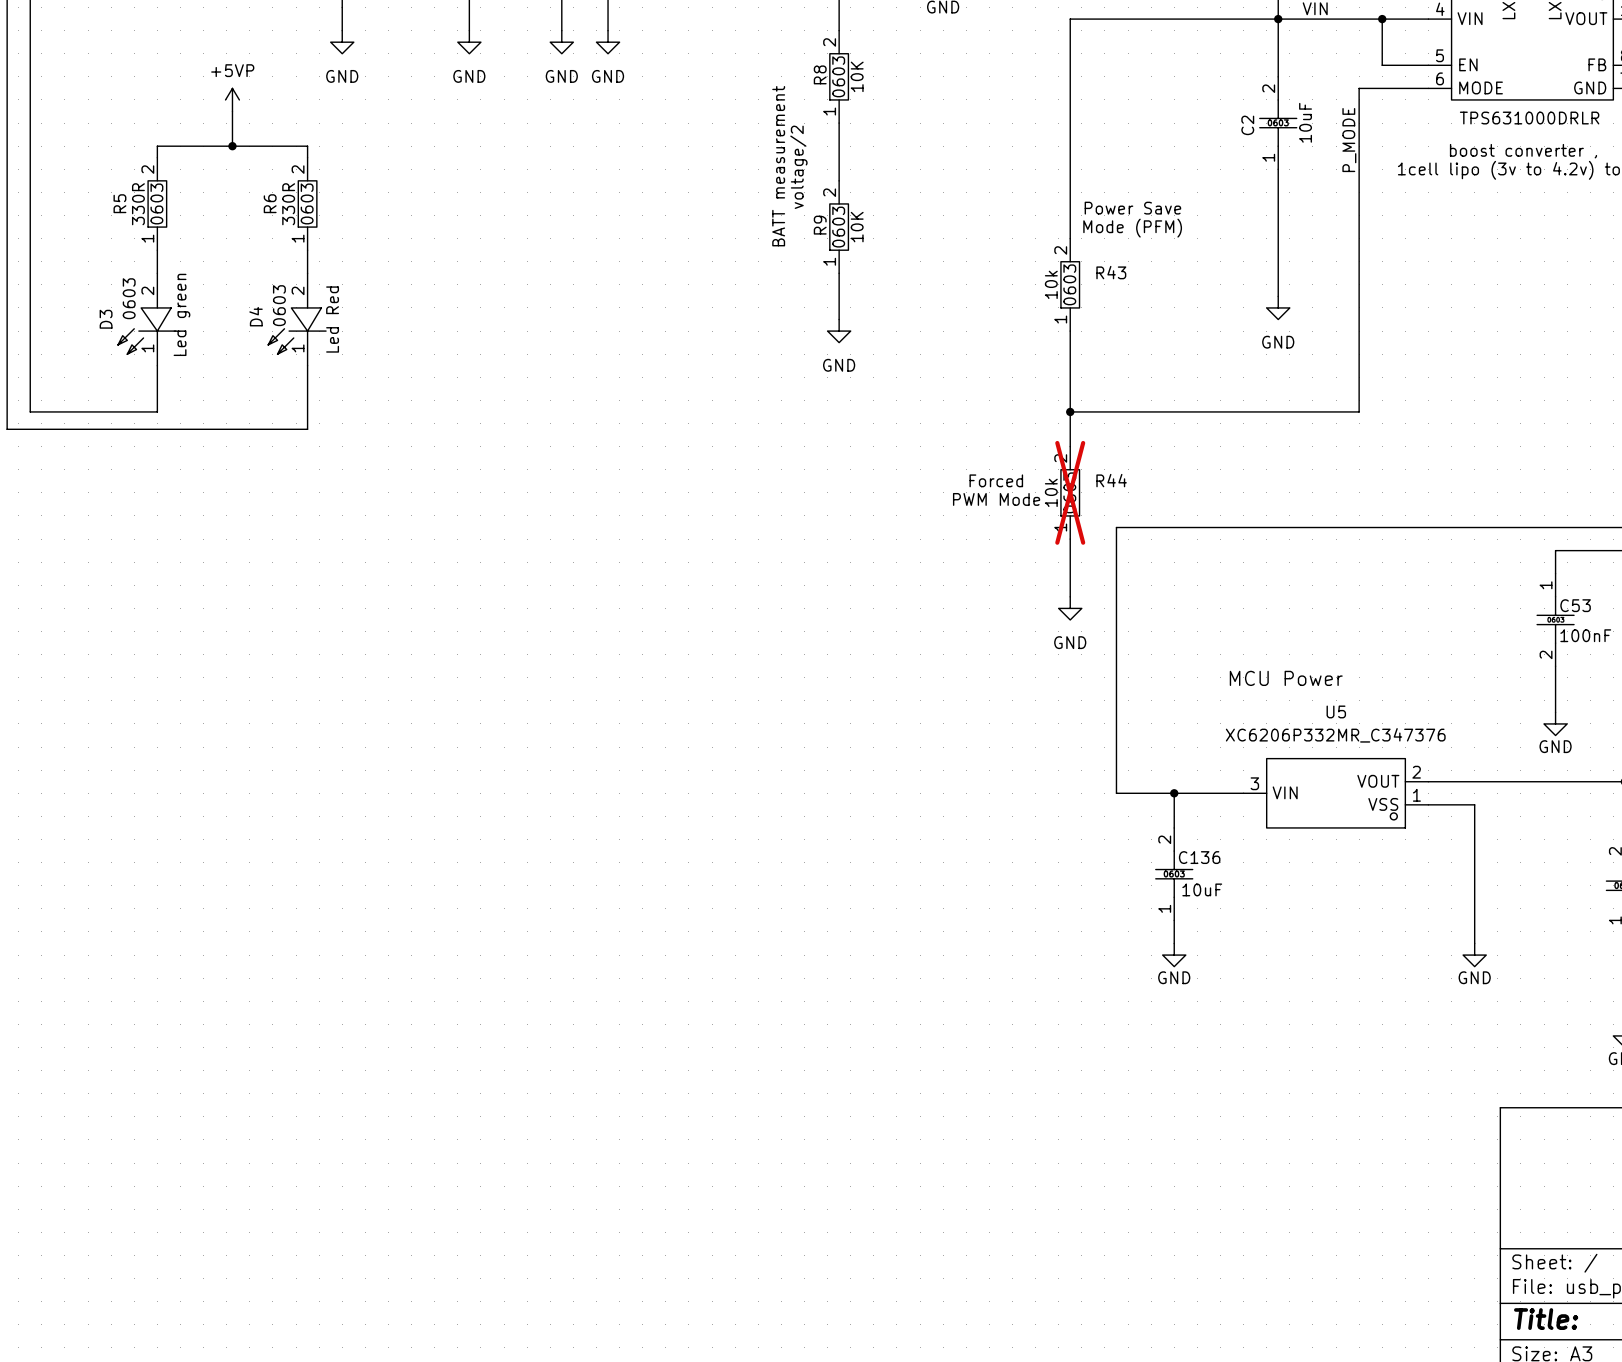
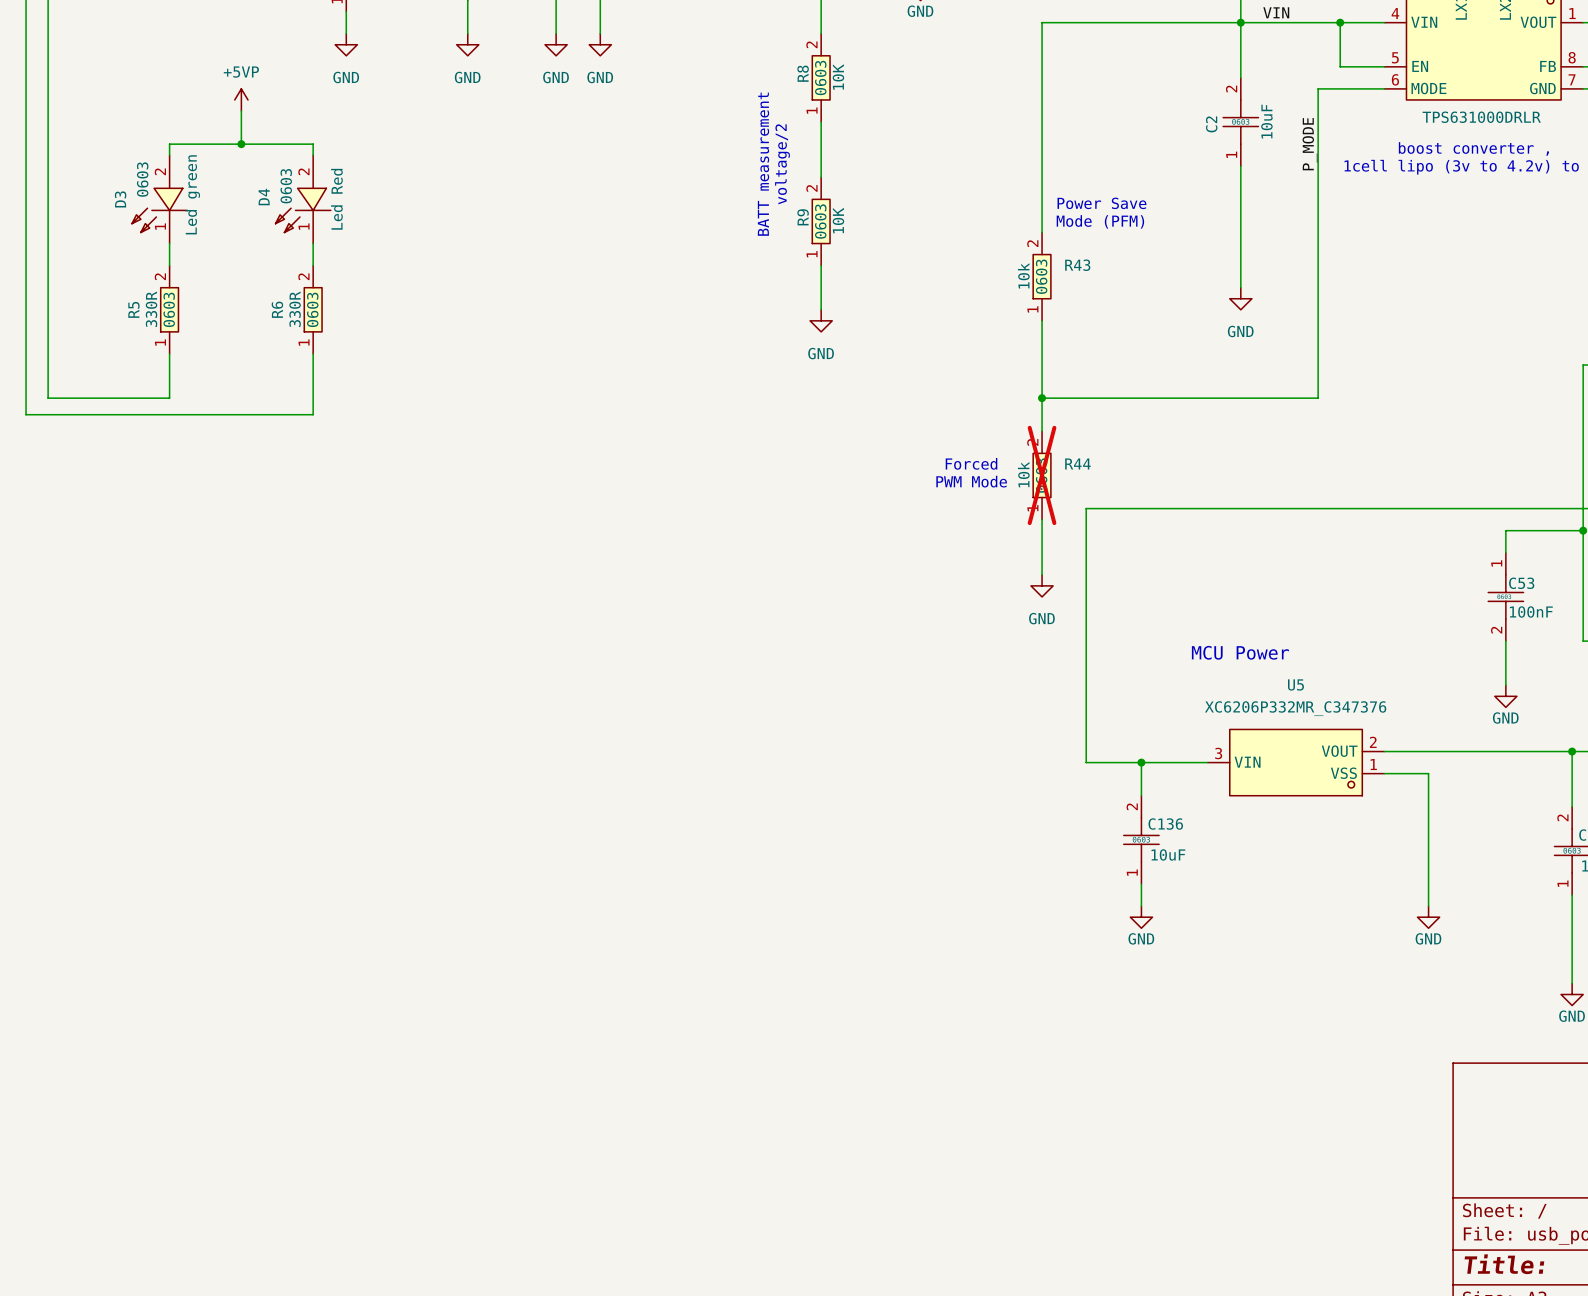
R5 position: (157, 203) -> (169, 309)
R6 position: (307, 203) -> (313, 309)
D3 position: (146, 319) -> (159, 199)
D4 position: (297, 319) -> (303, 199)

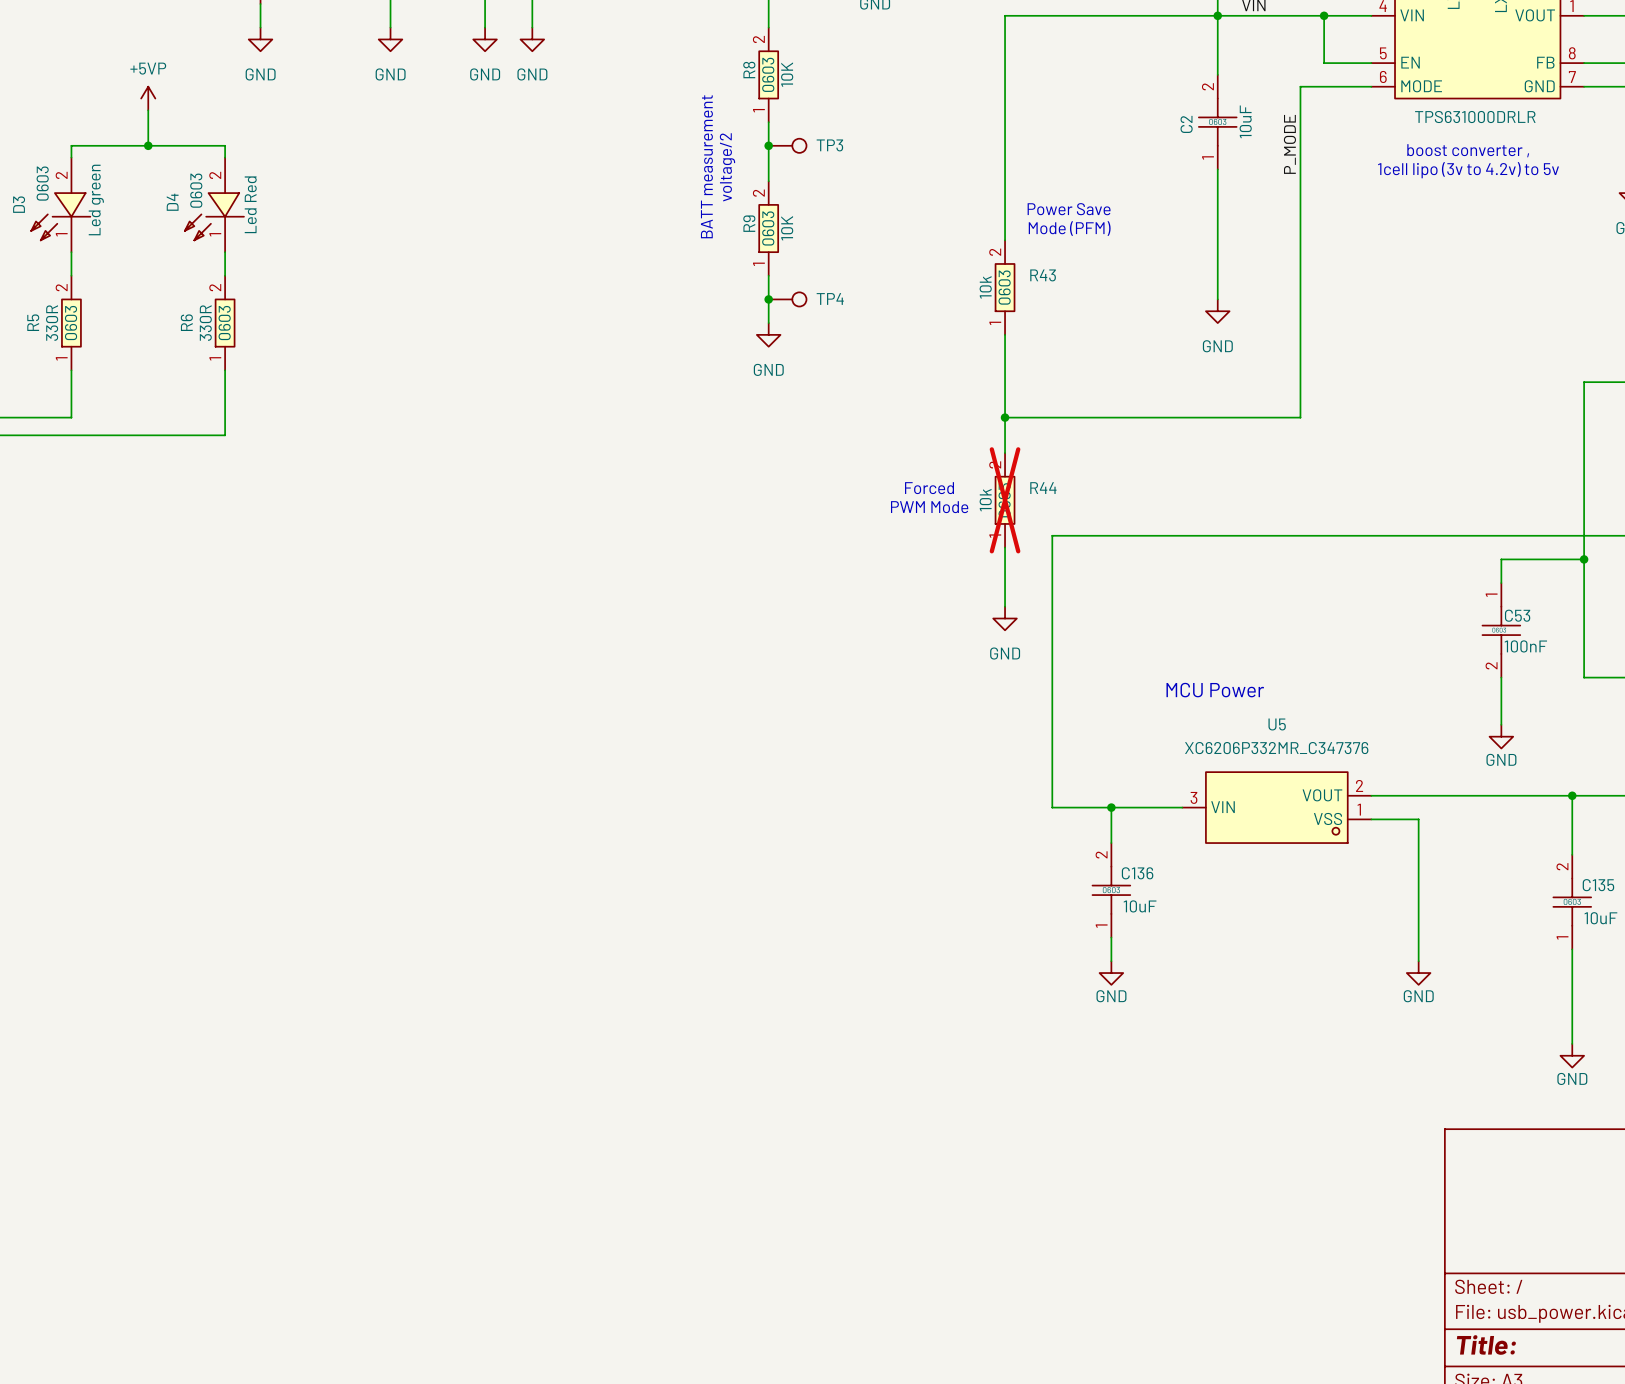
junction: none -> (768, 145)
TP3: none -> (787, 145)
junction: none -> (768, 299)
TP4: none -> (787, 299)

